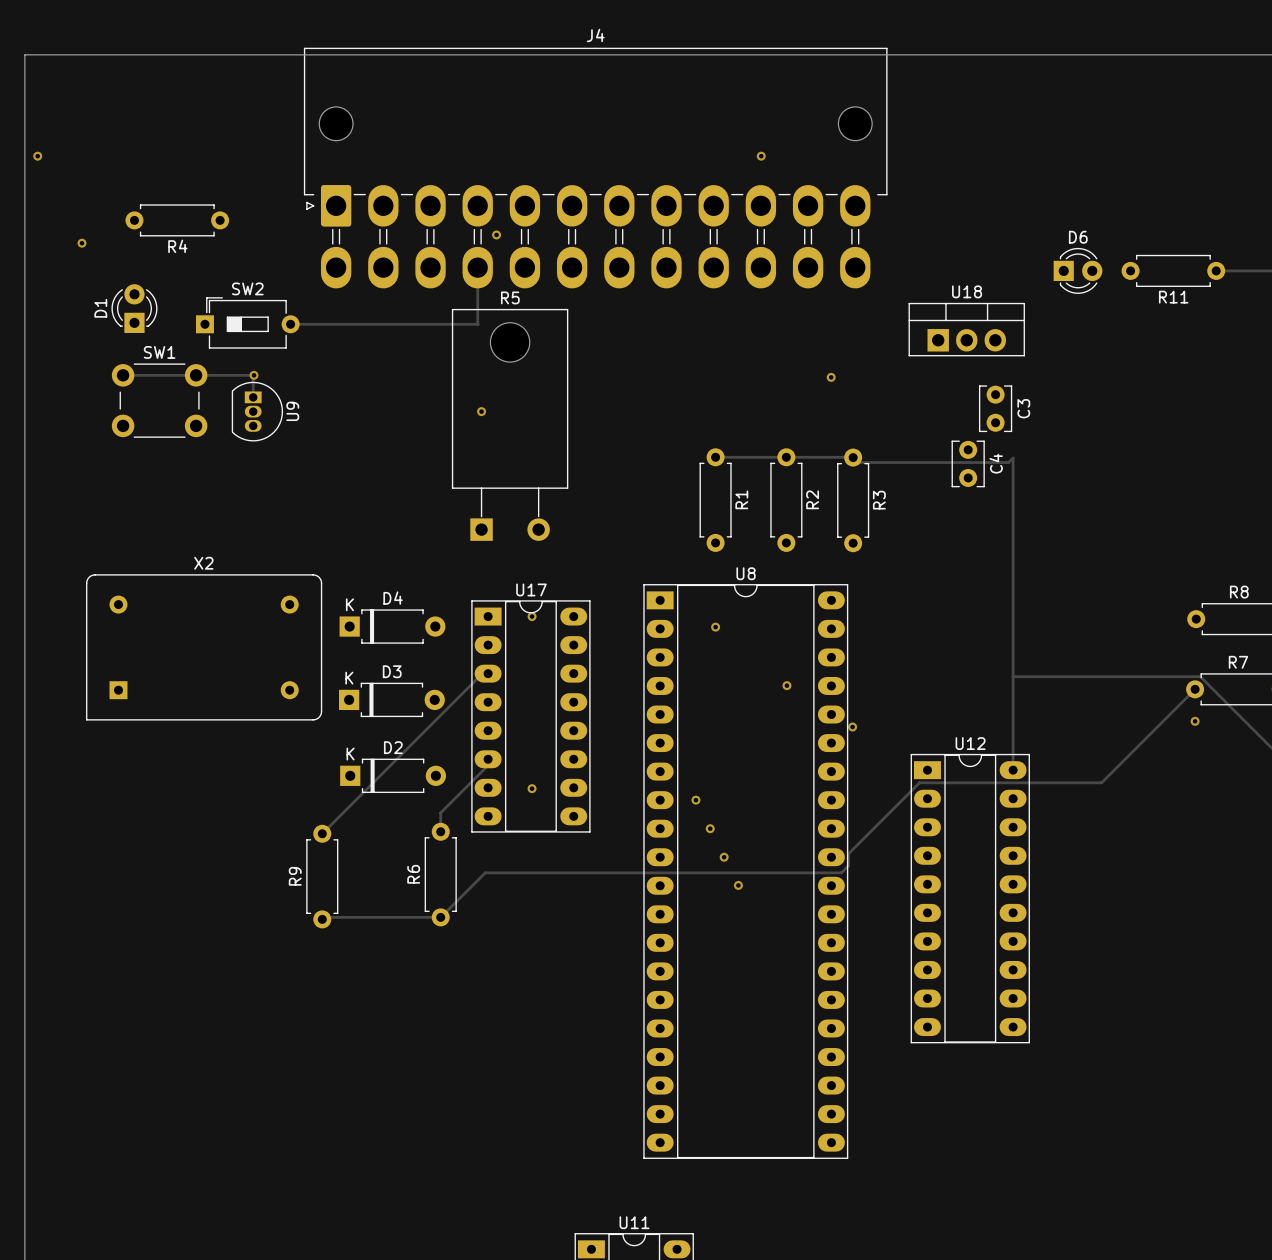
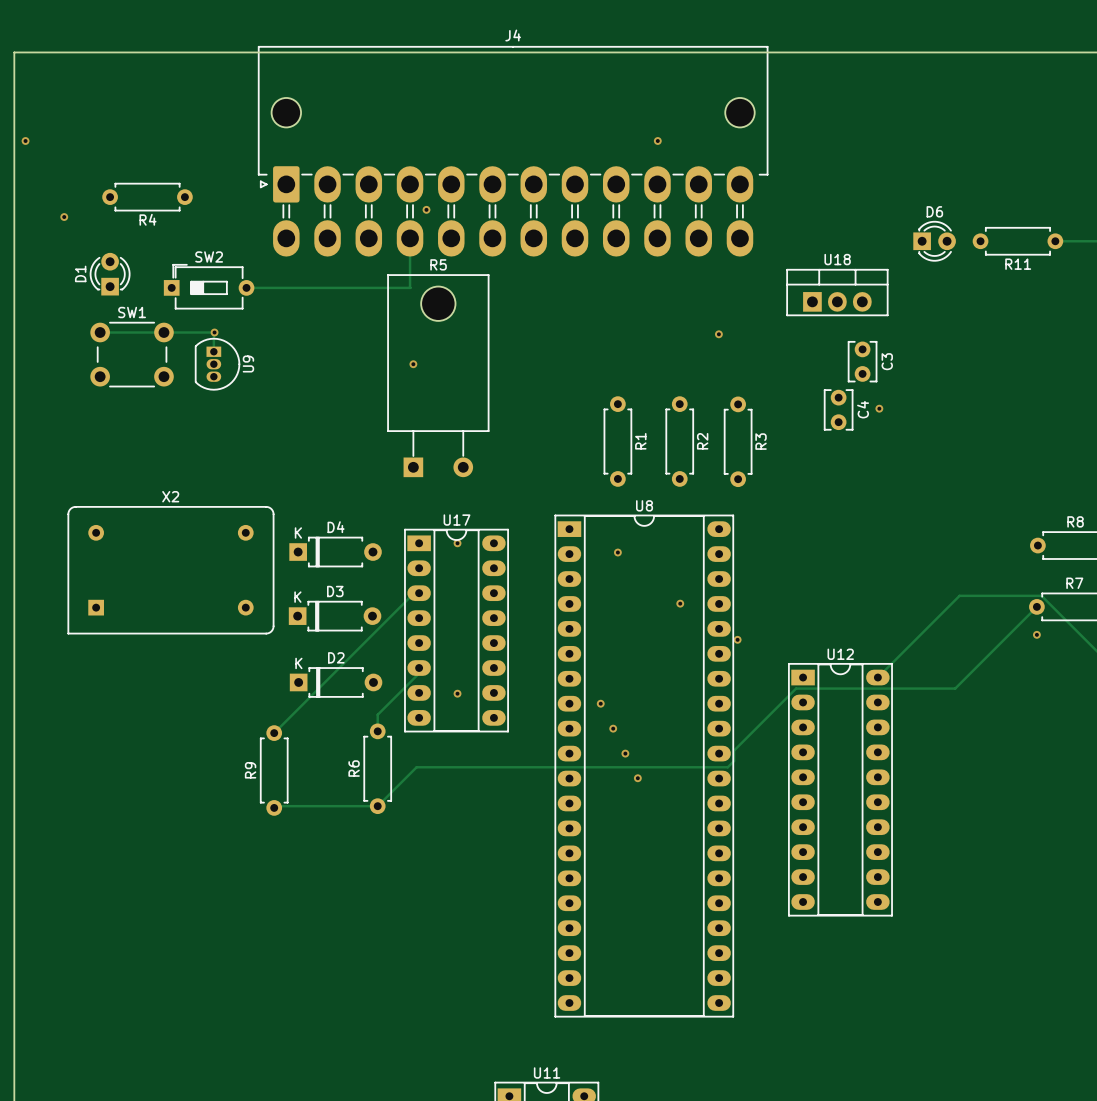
track: (715, 457) (853, 457) -> none
track: (858, 462) (1008, 462) (1013, 458) (1013, 770) -> none
via: none -> (879, 408)
track: (1013, 676) (1106, 676) -> (877, 677) (959, 595)

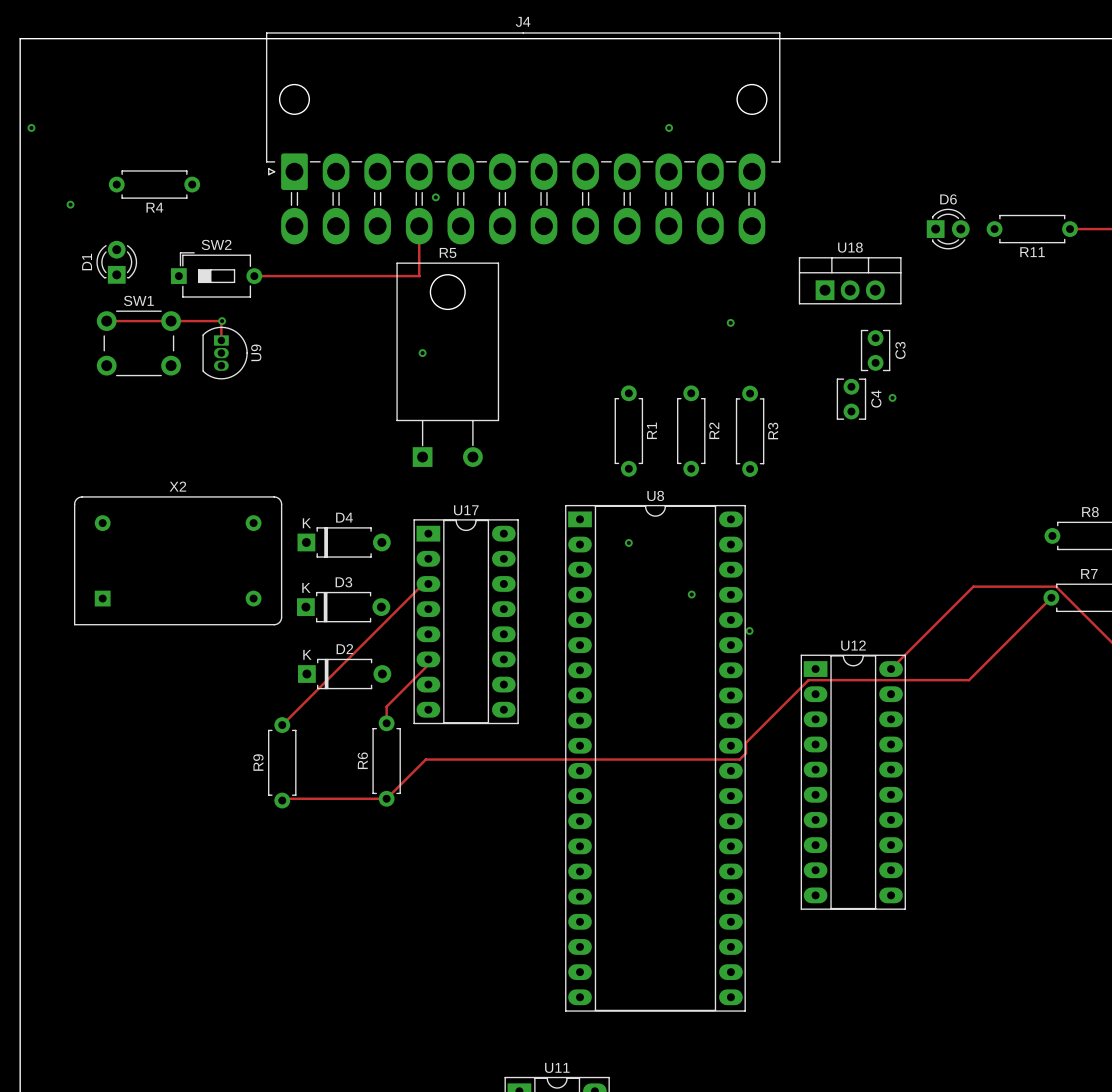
via: (457, 543) -> none
via: (1036, 634) -> none
via: (457, 693) -> none
via: (600, 703) -> none
via: (613, 728) -> none
via: (625, 753) -> none
via: (637, 778) -> none

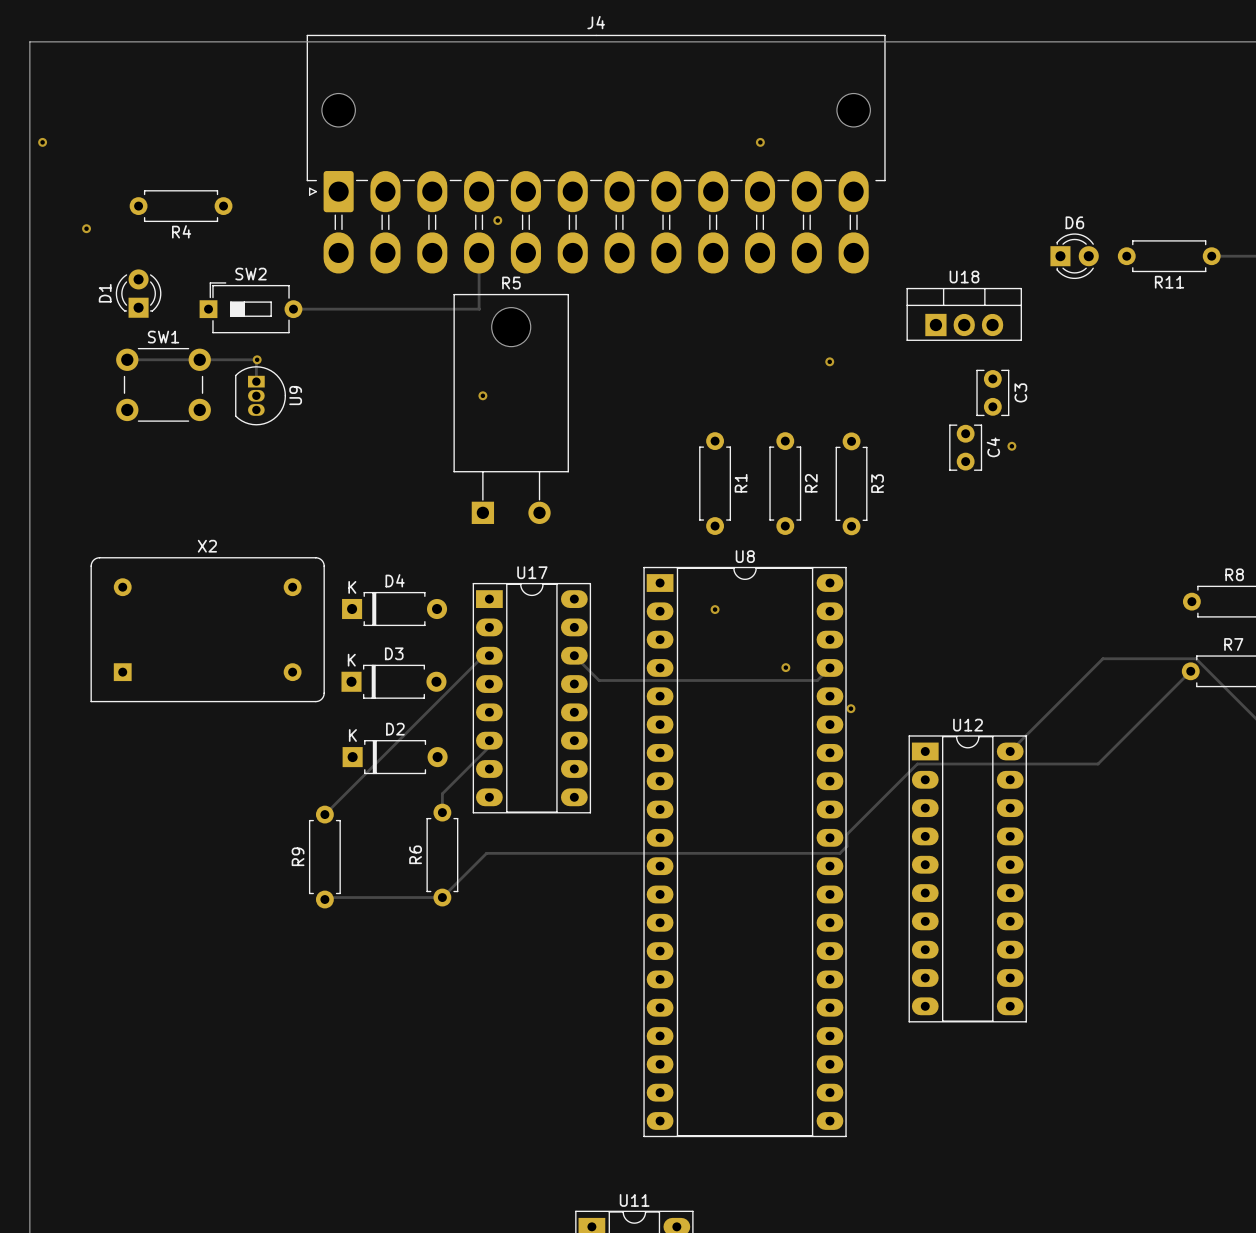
track: none -> (574, 655) (599, 680) (817, 680) (829, 667)

